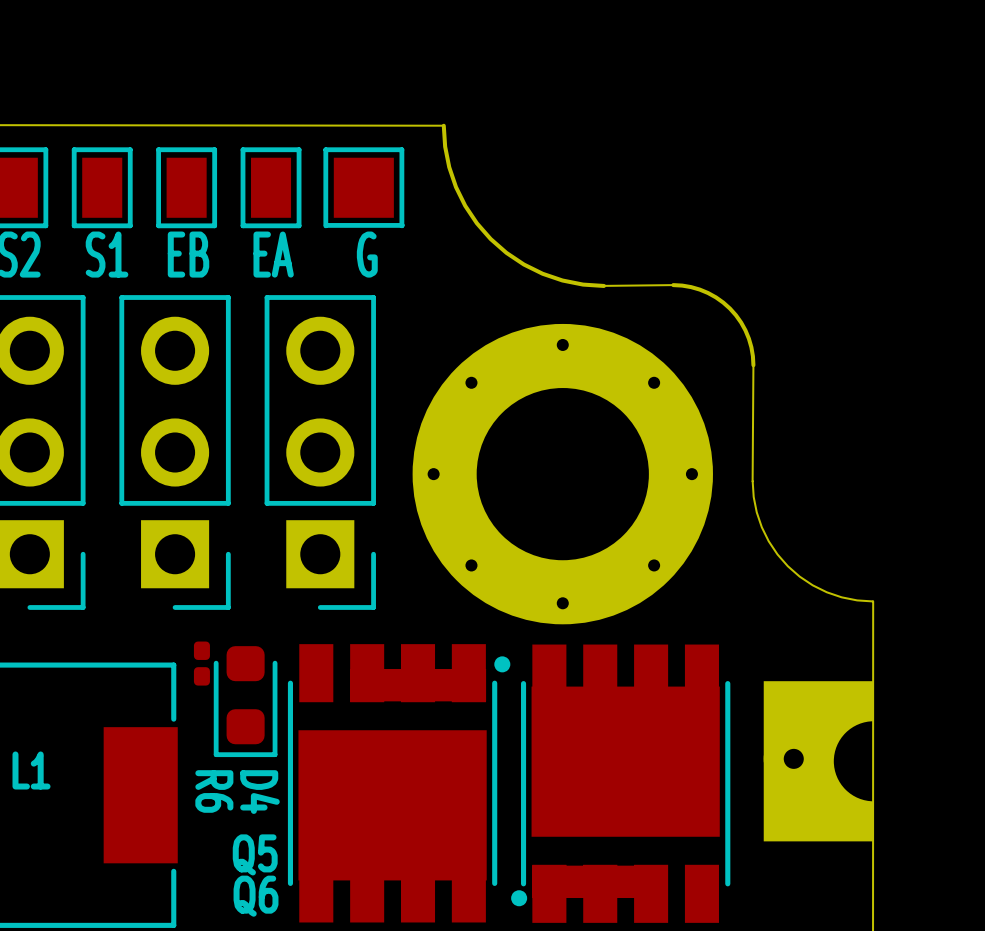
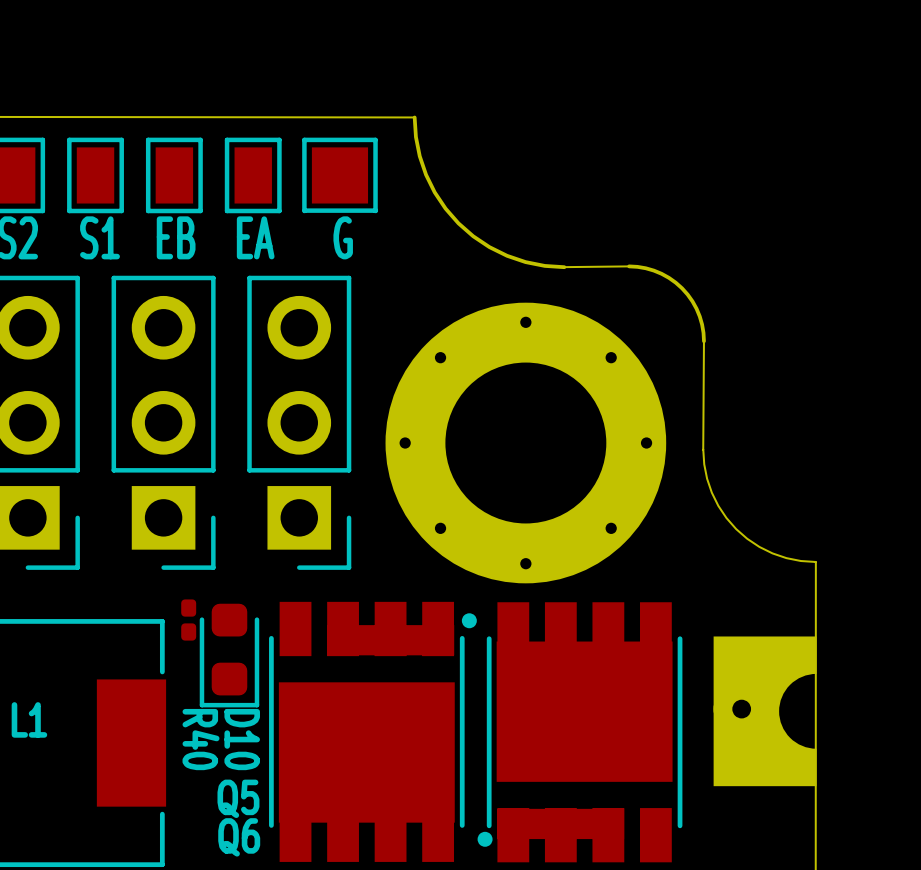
R6 name: R6 (214, 791) -> R40 (201, 739)
D4 name: D4 (259, 792) -> D10 (242, 739)

